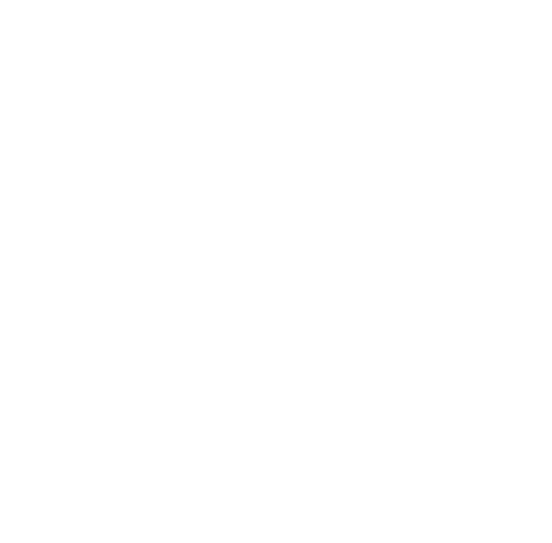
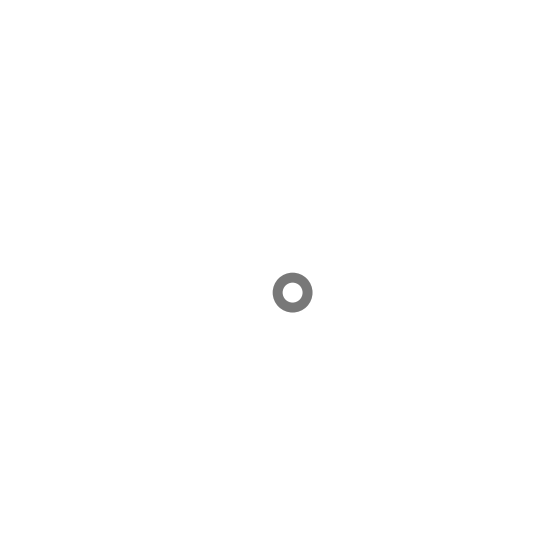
via: none -> (292, 292)

